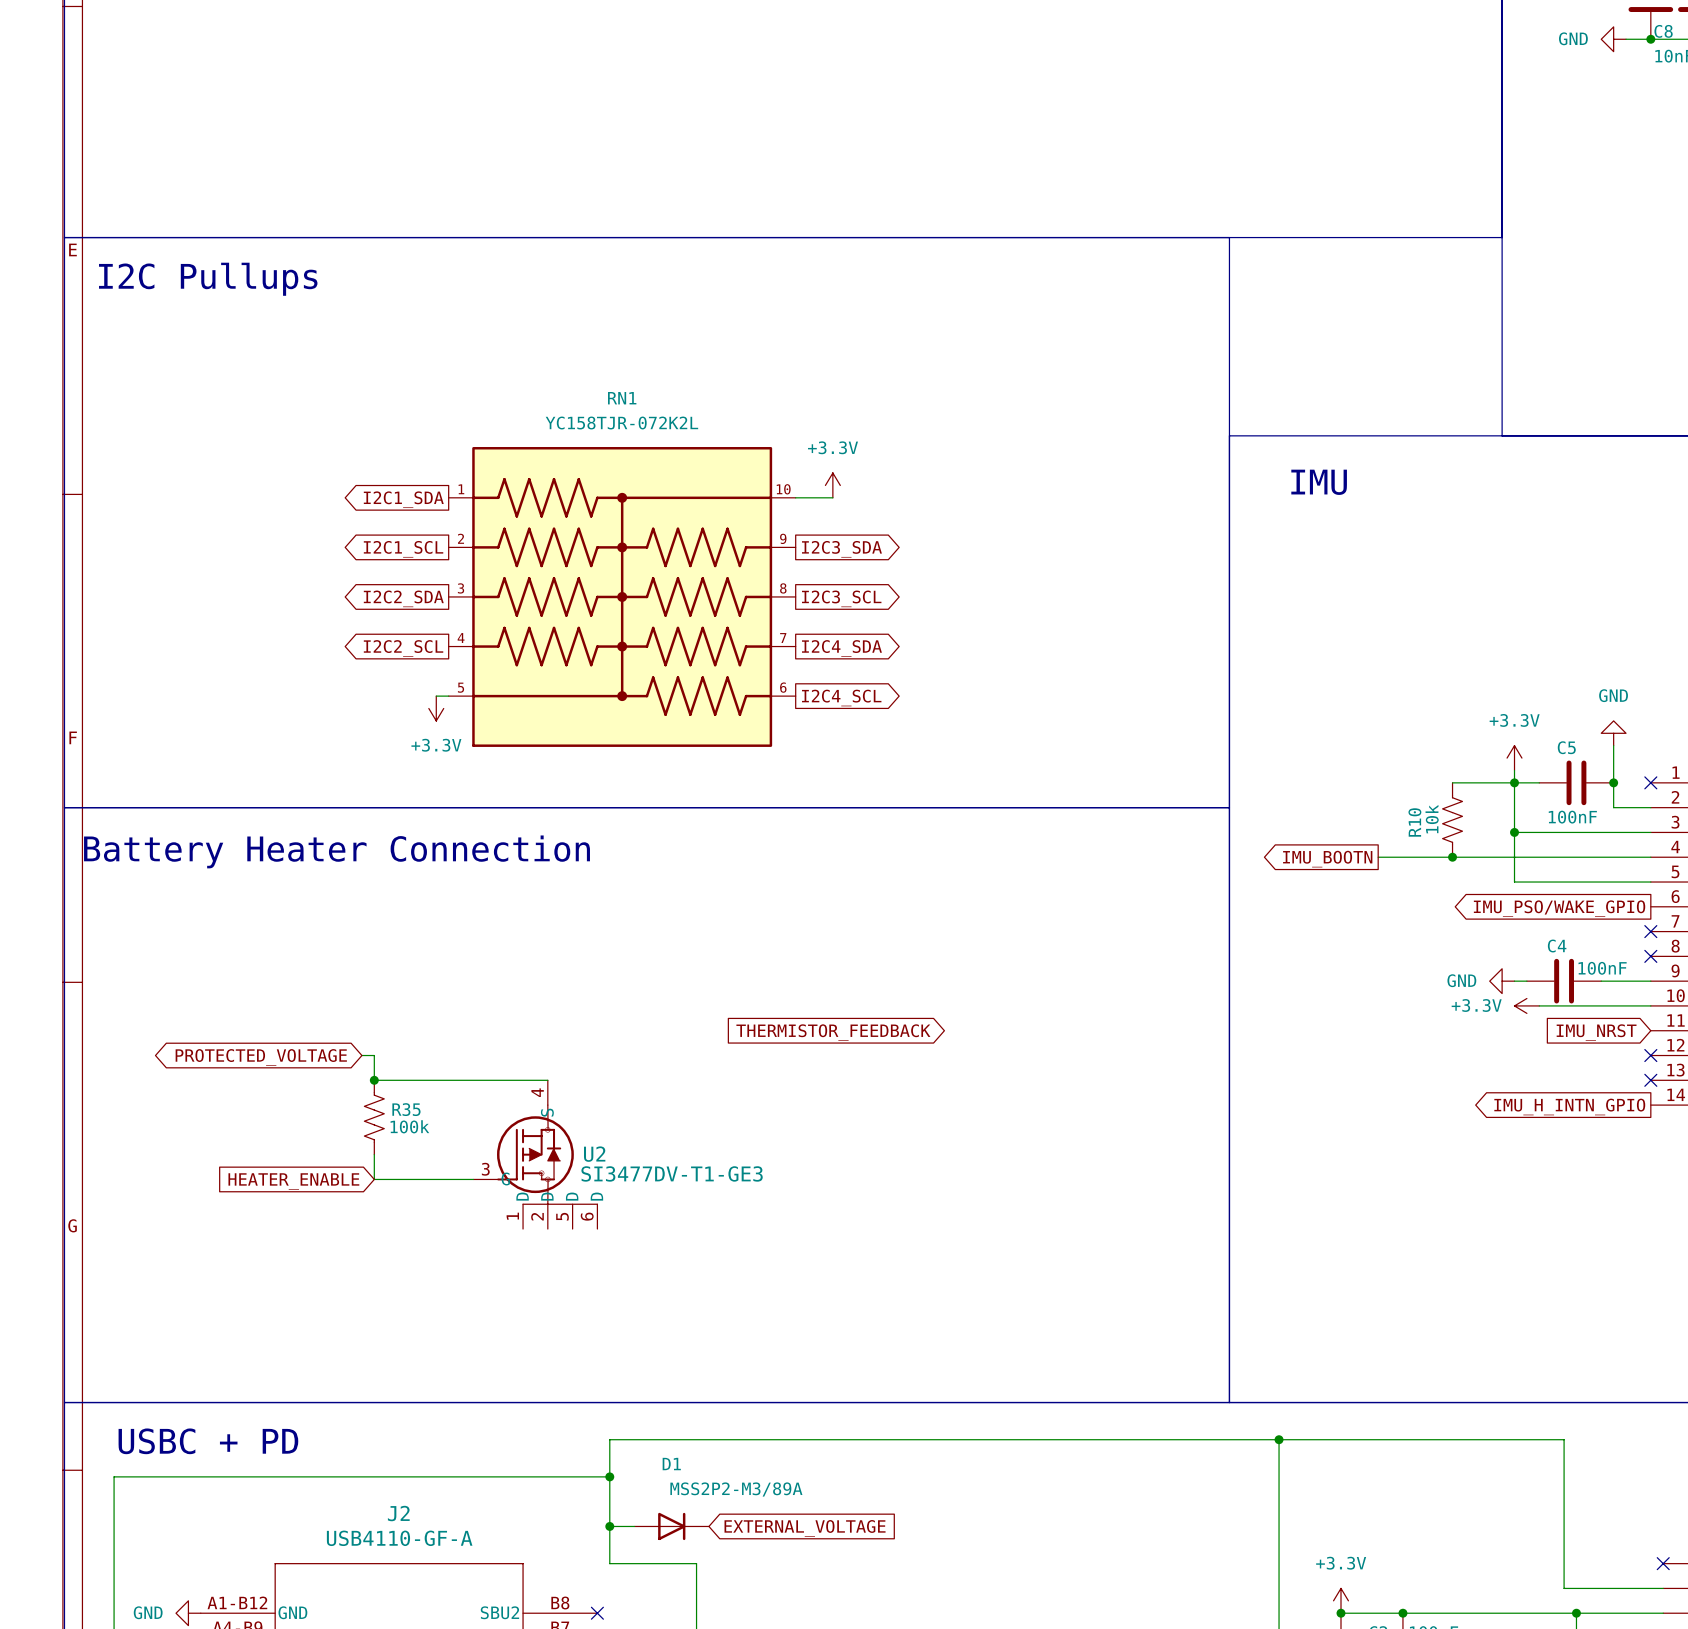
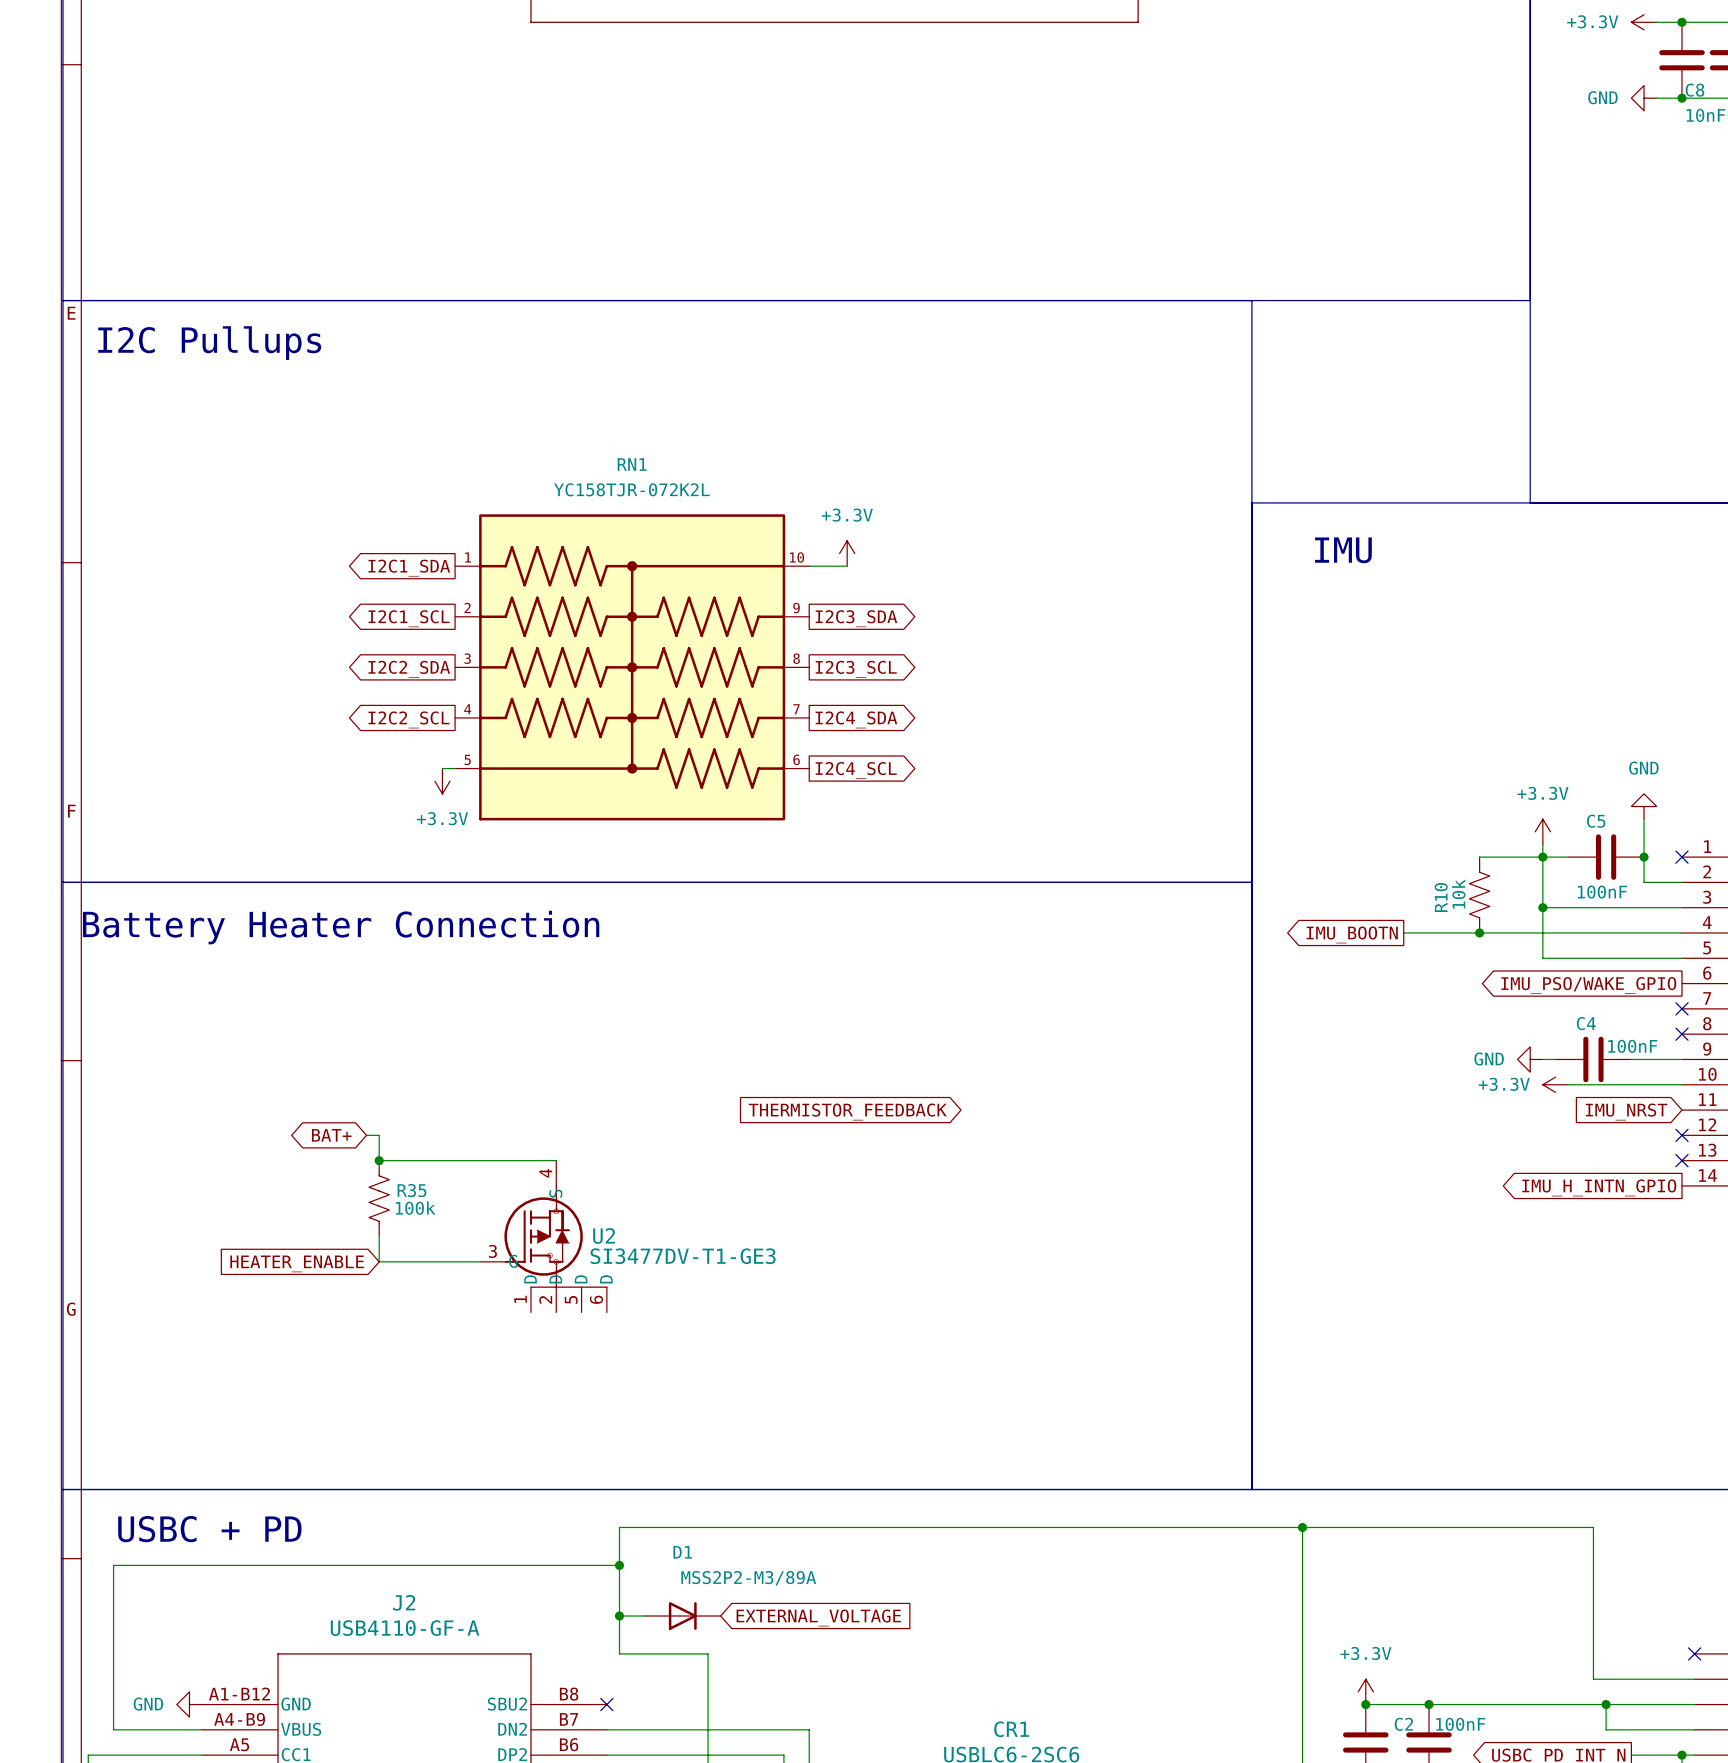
global label: PROTECTED_VOLTAGE (261, 1057) -> BAT+ (331, 1135)

